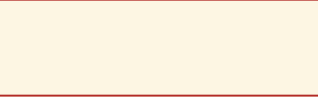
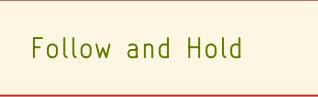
text: none -> Follow and Hold (136, 47)

